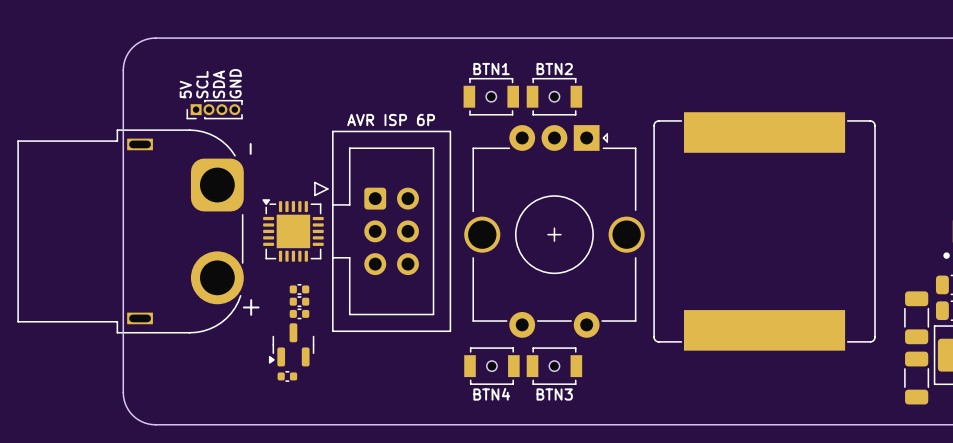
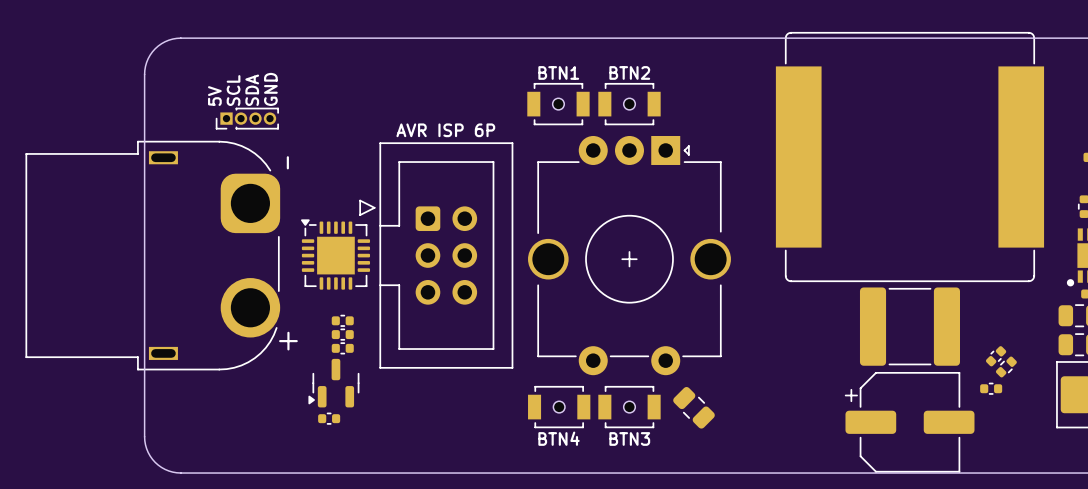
part rotation: 0° (764, 231) -> 90° clockwise (909, 157)
part: none -> (909, 326)
part: (916, 317) -> none
part: none -> (996, 356)
part: none -> (1006, 366)
part: none -> (991, 388)
part: none -> (693, 407)
part: (916, 378) -> none
part: none -> (909, 422)

